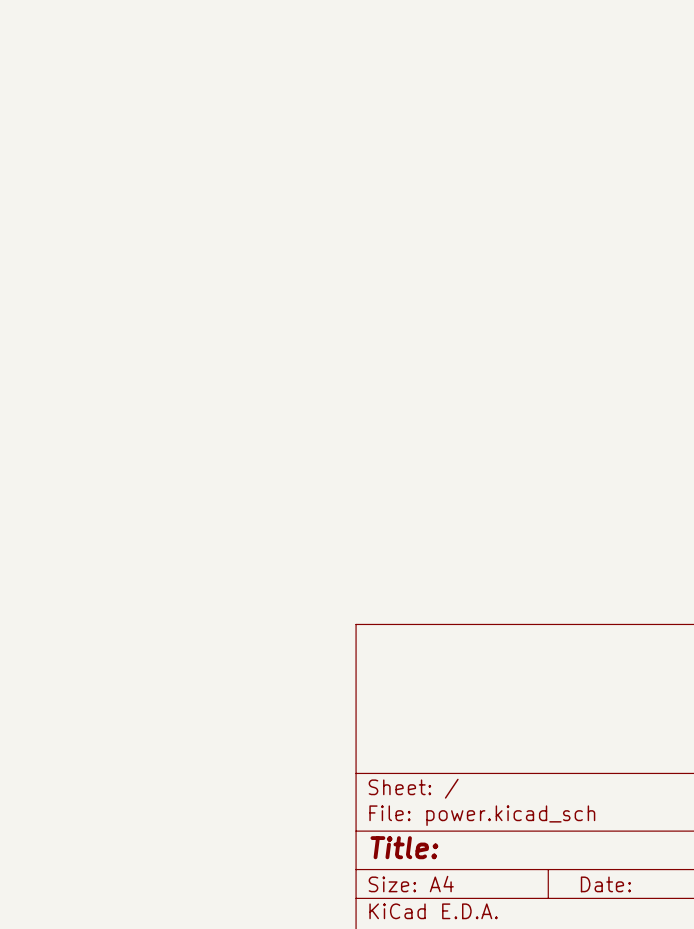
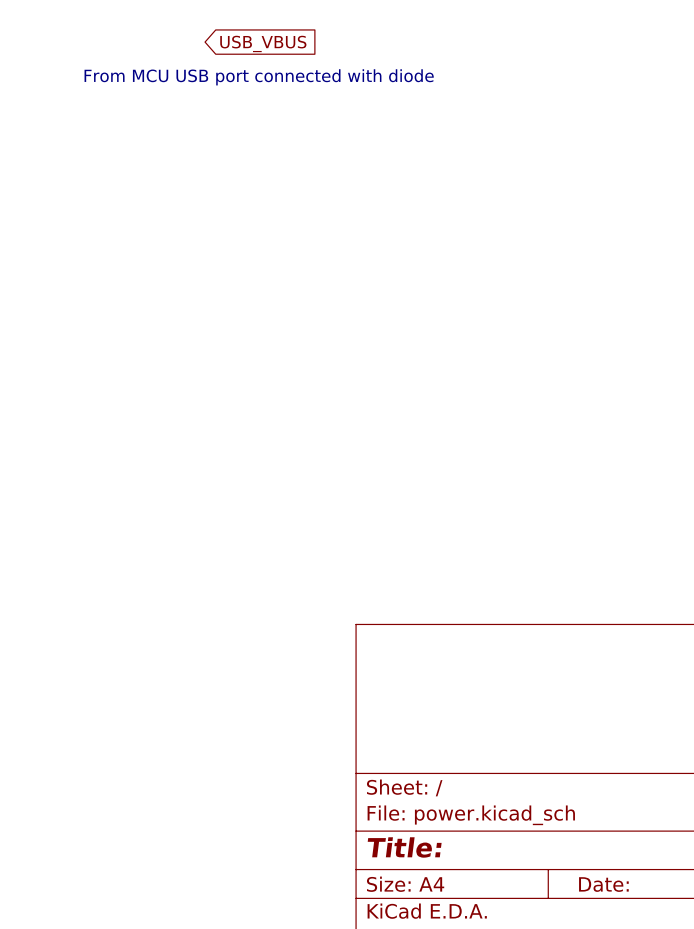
global label: none -> USB_VBUS (263, 43)
text: none -> From MCU USB port connected with diode (259, 77)

